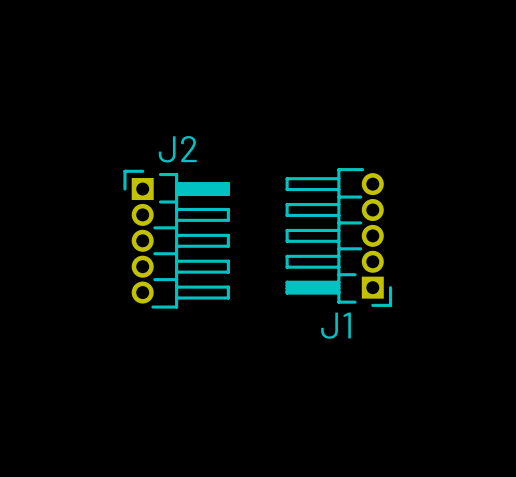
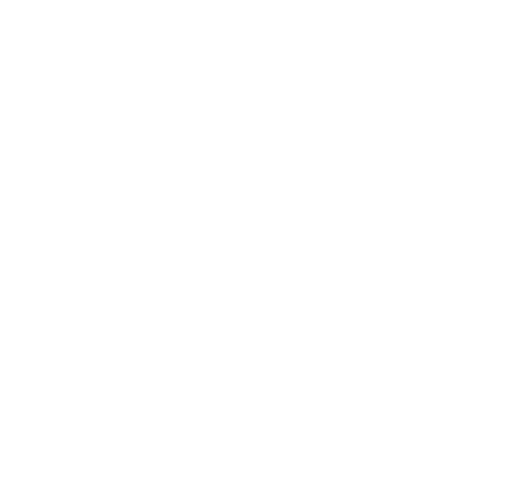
J1: (338, 237) -> none
J2: (176, 239) -> none

